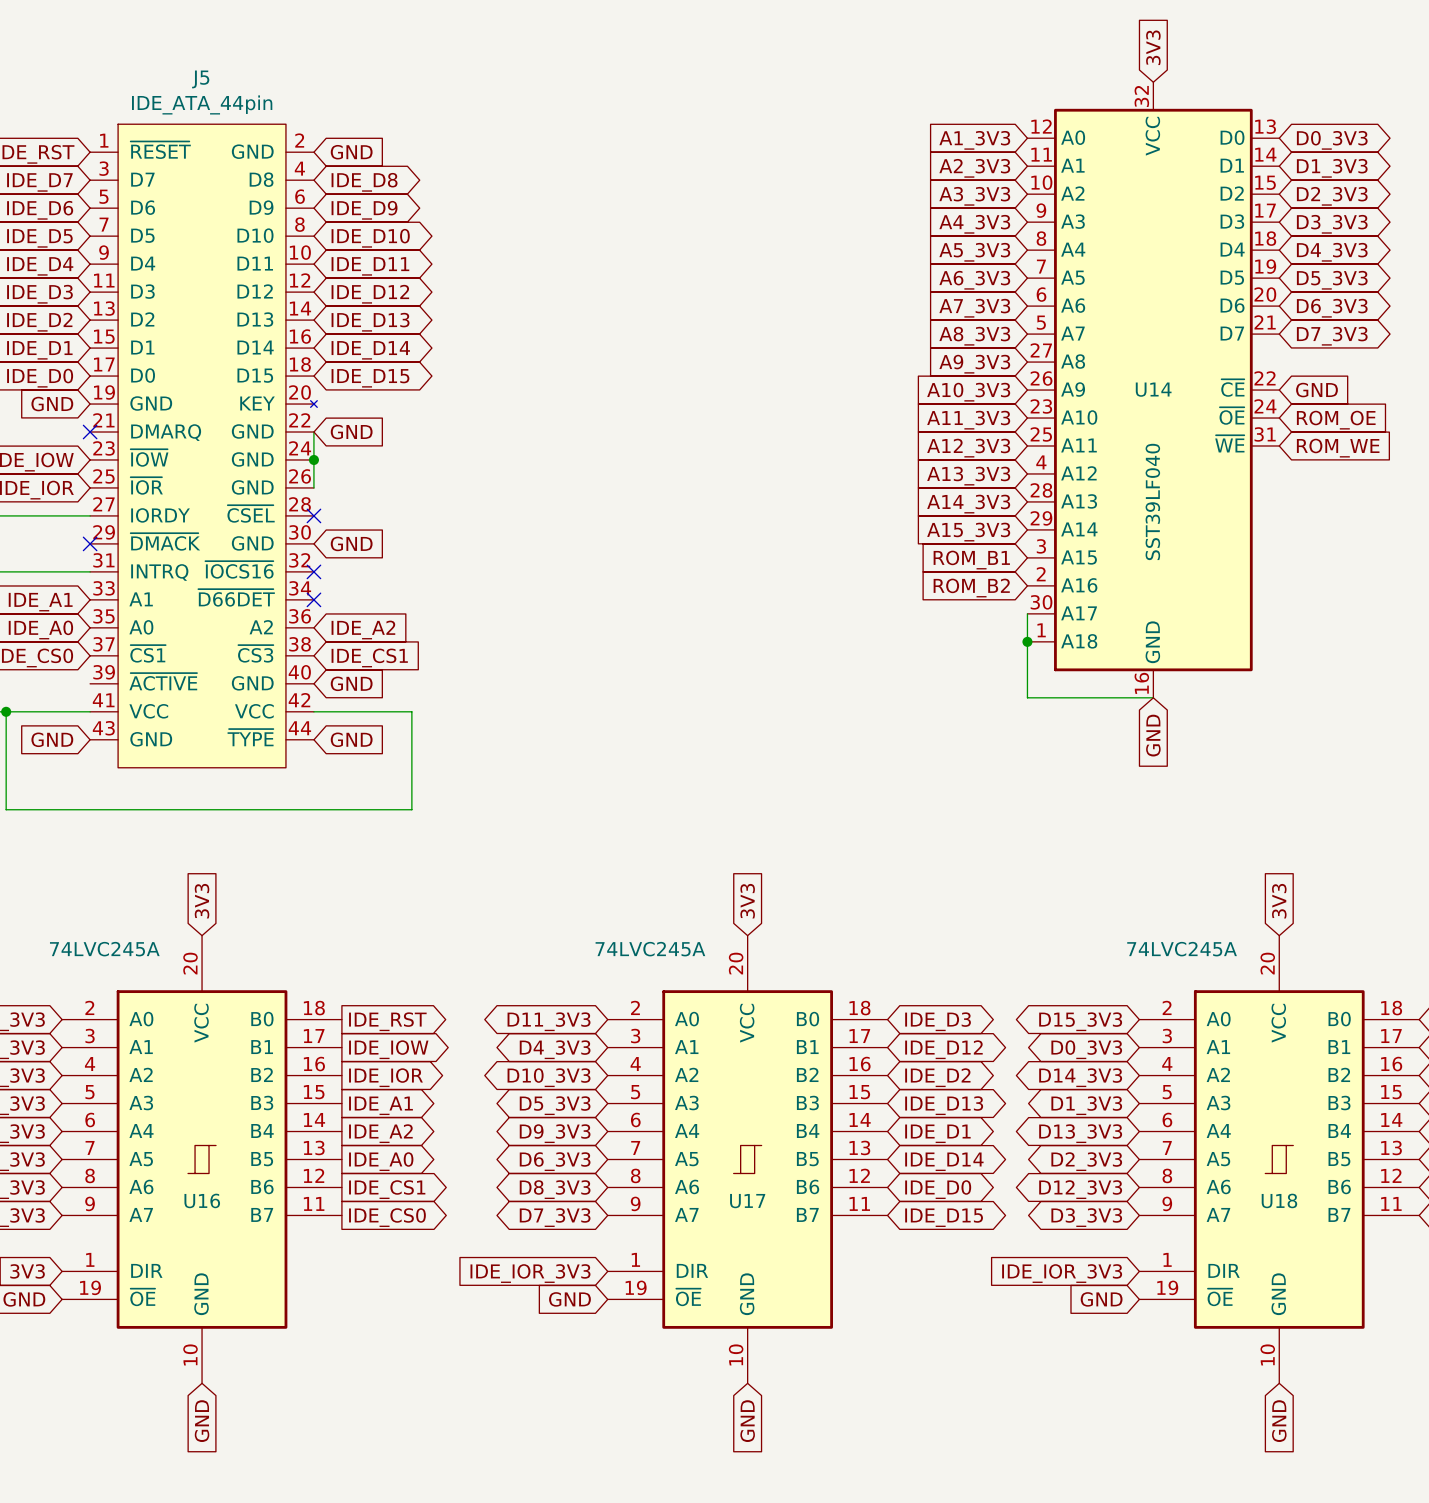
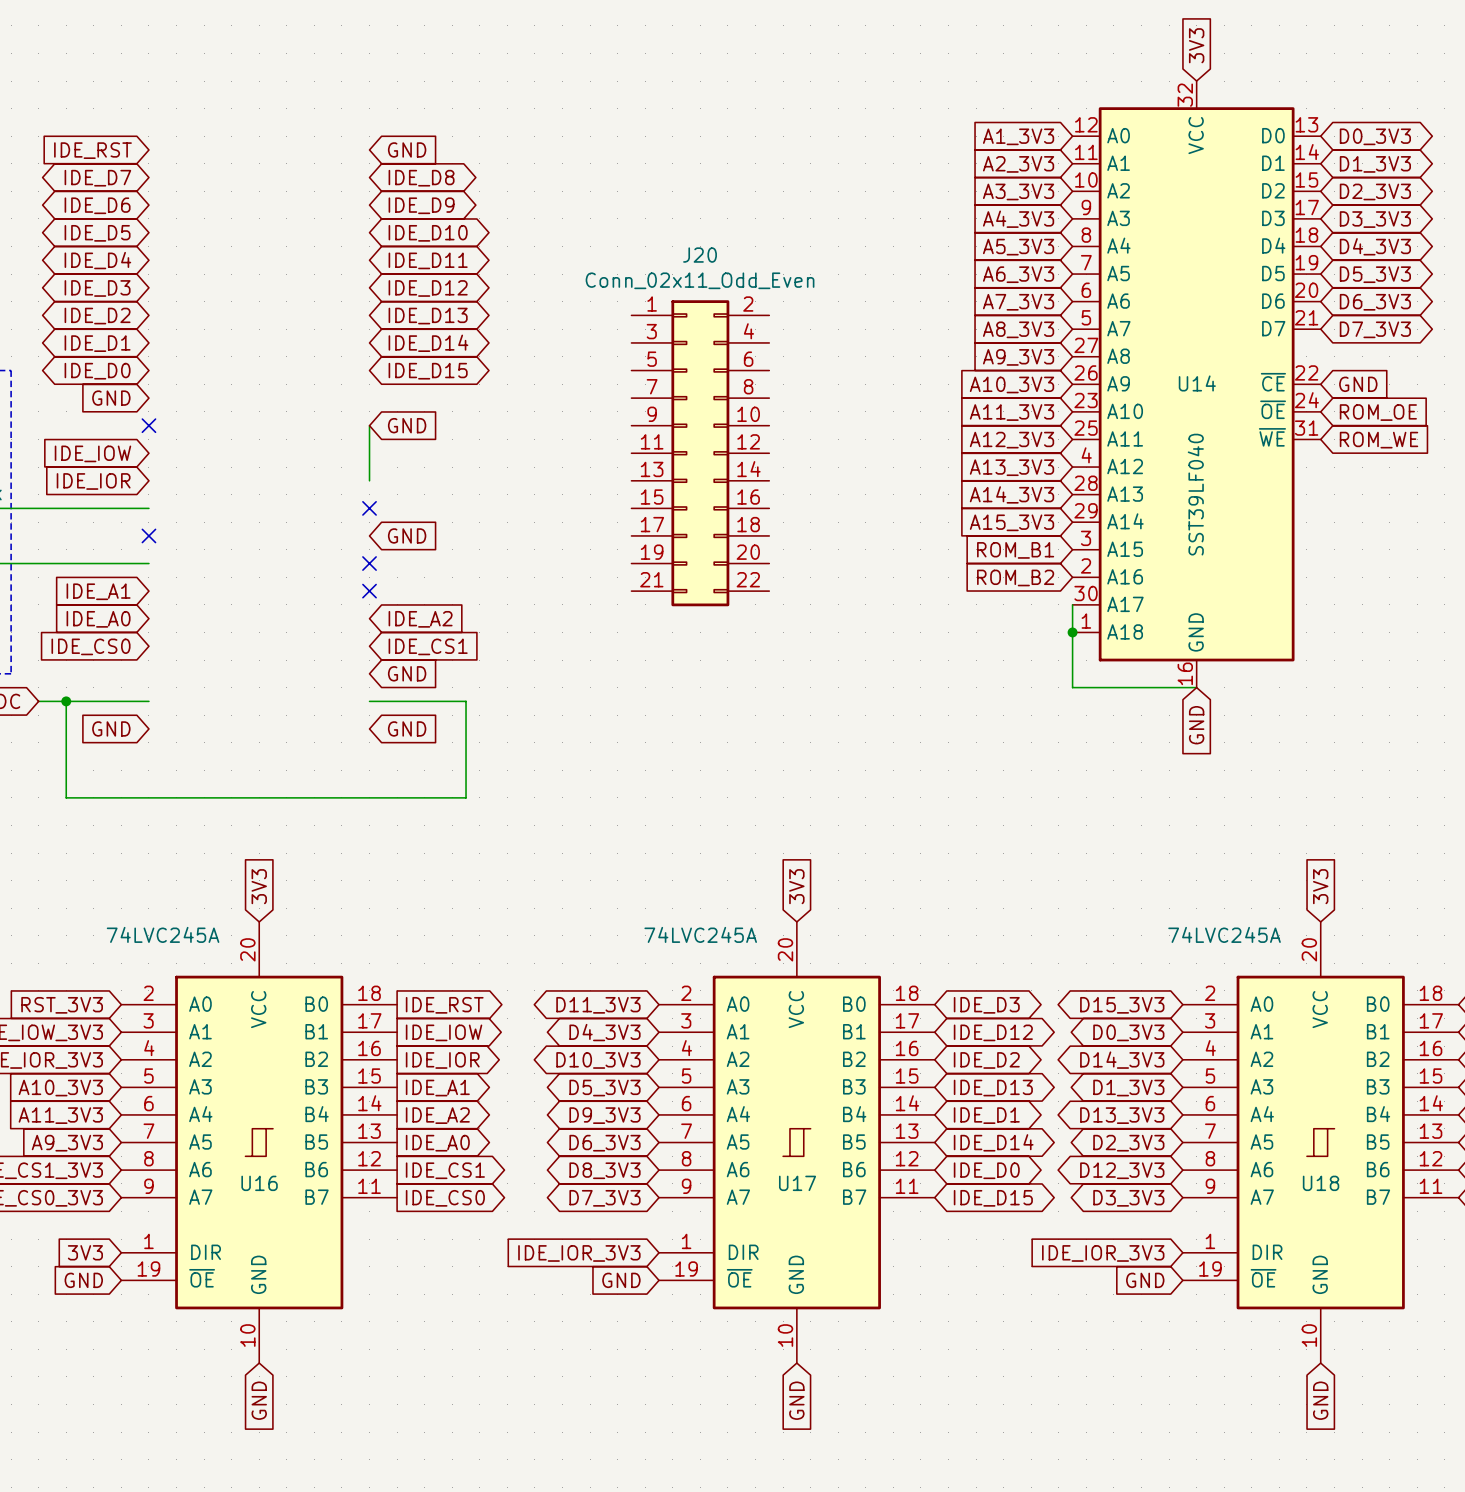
J5: IDE_ATA_44pin (203, 445) -> none
junction: (313, 459) -> none
J20: none -> Conn_02x11_Odd_Even (700, 453)

